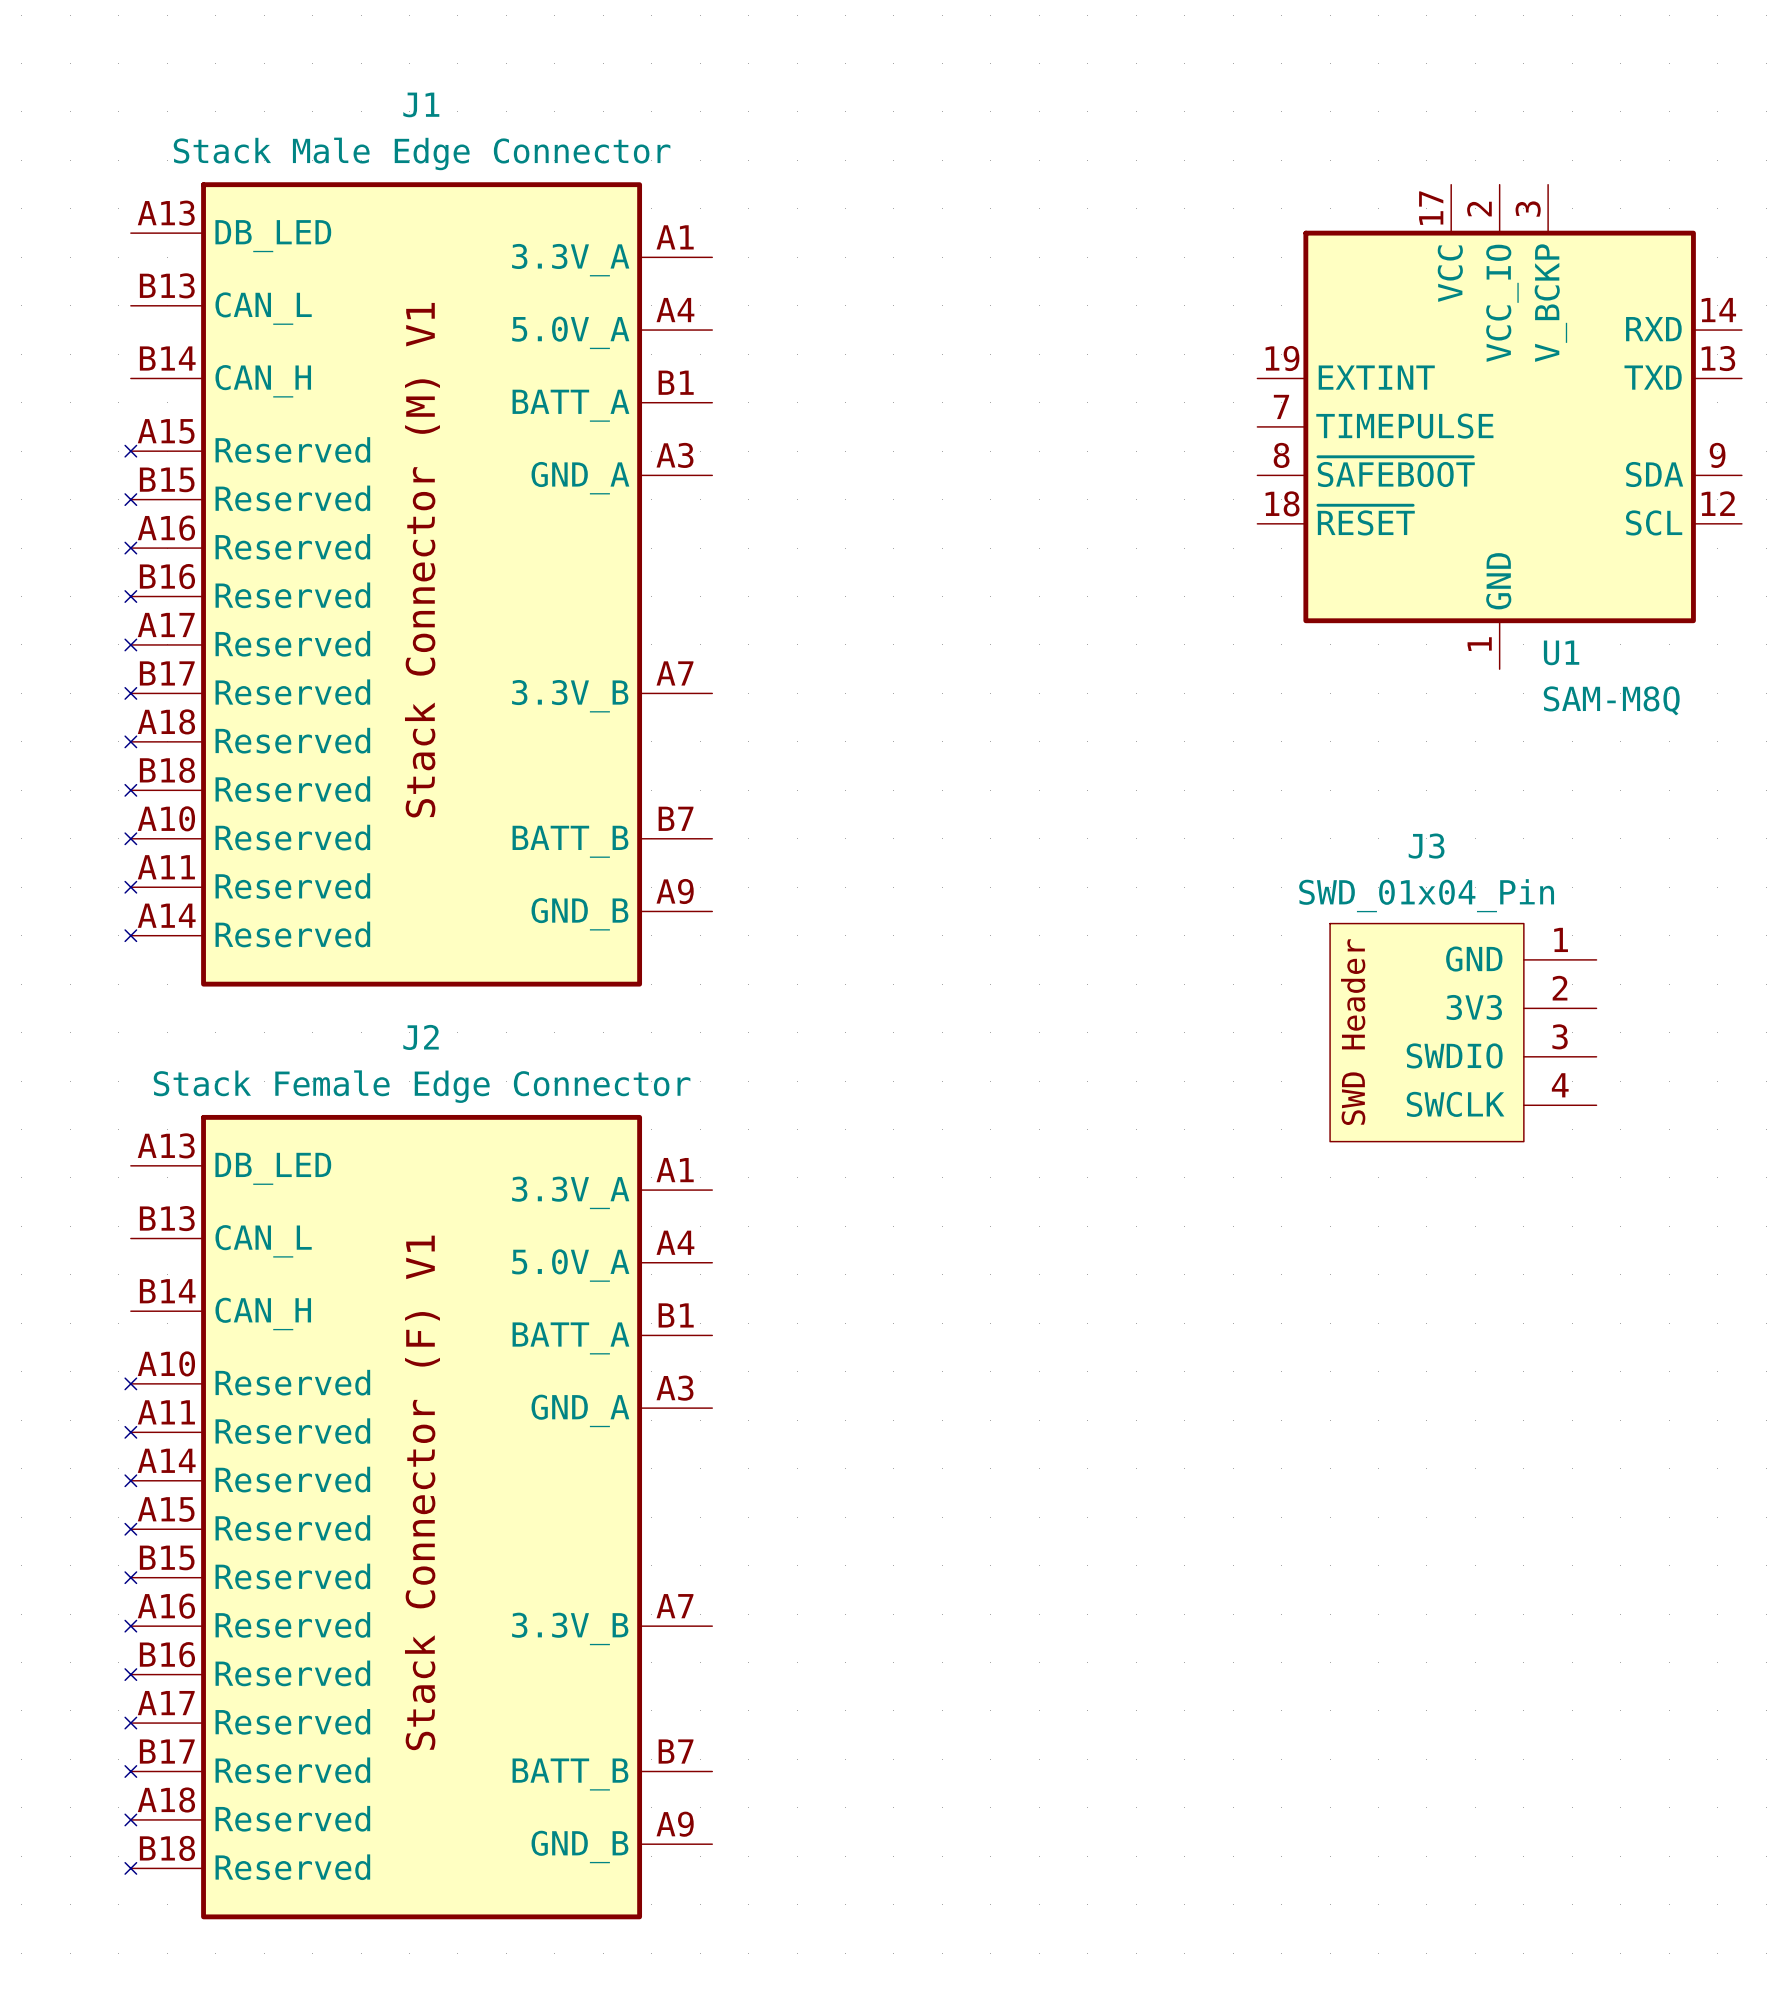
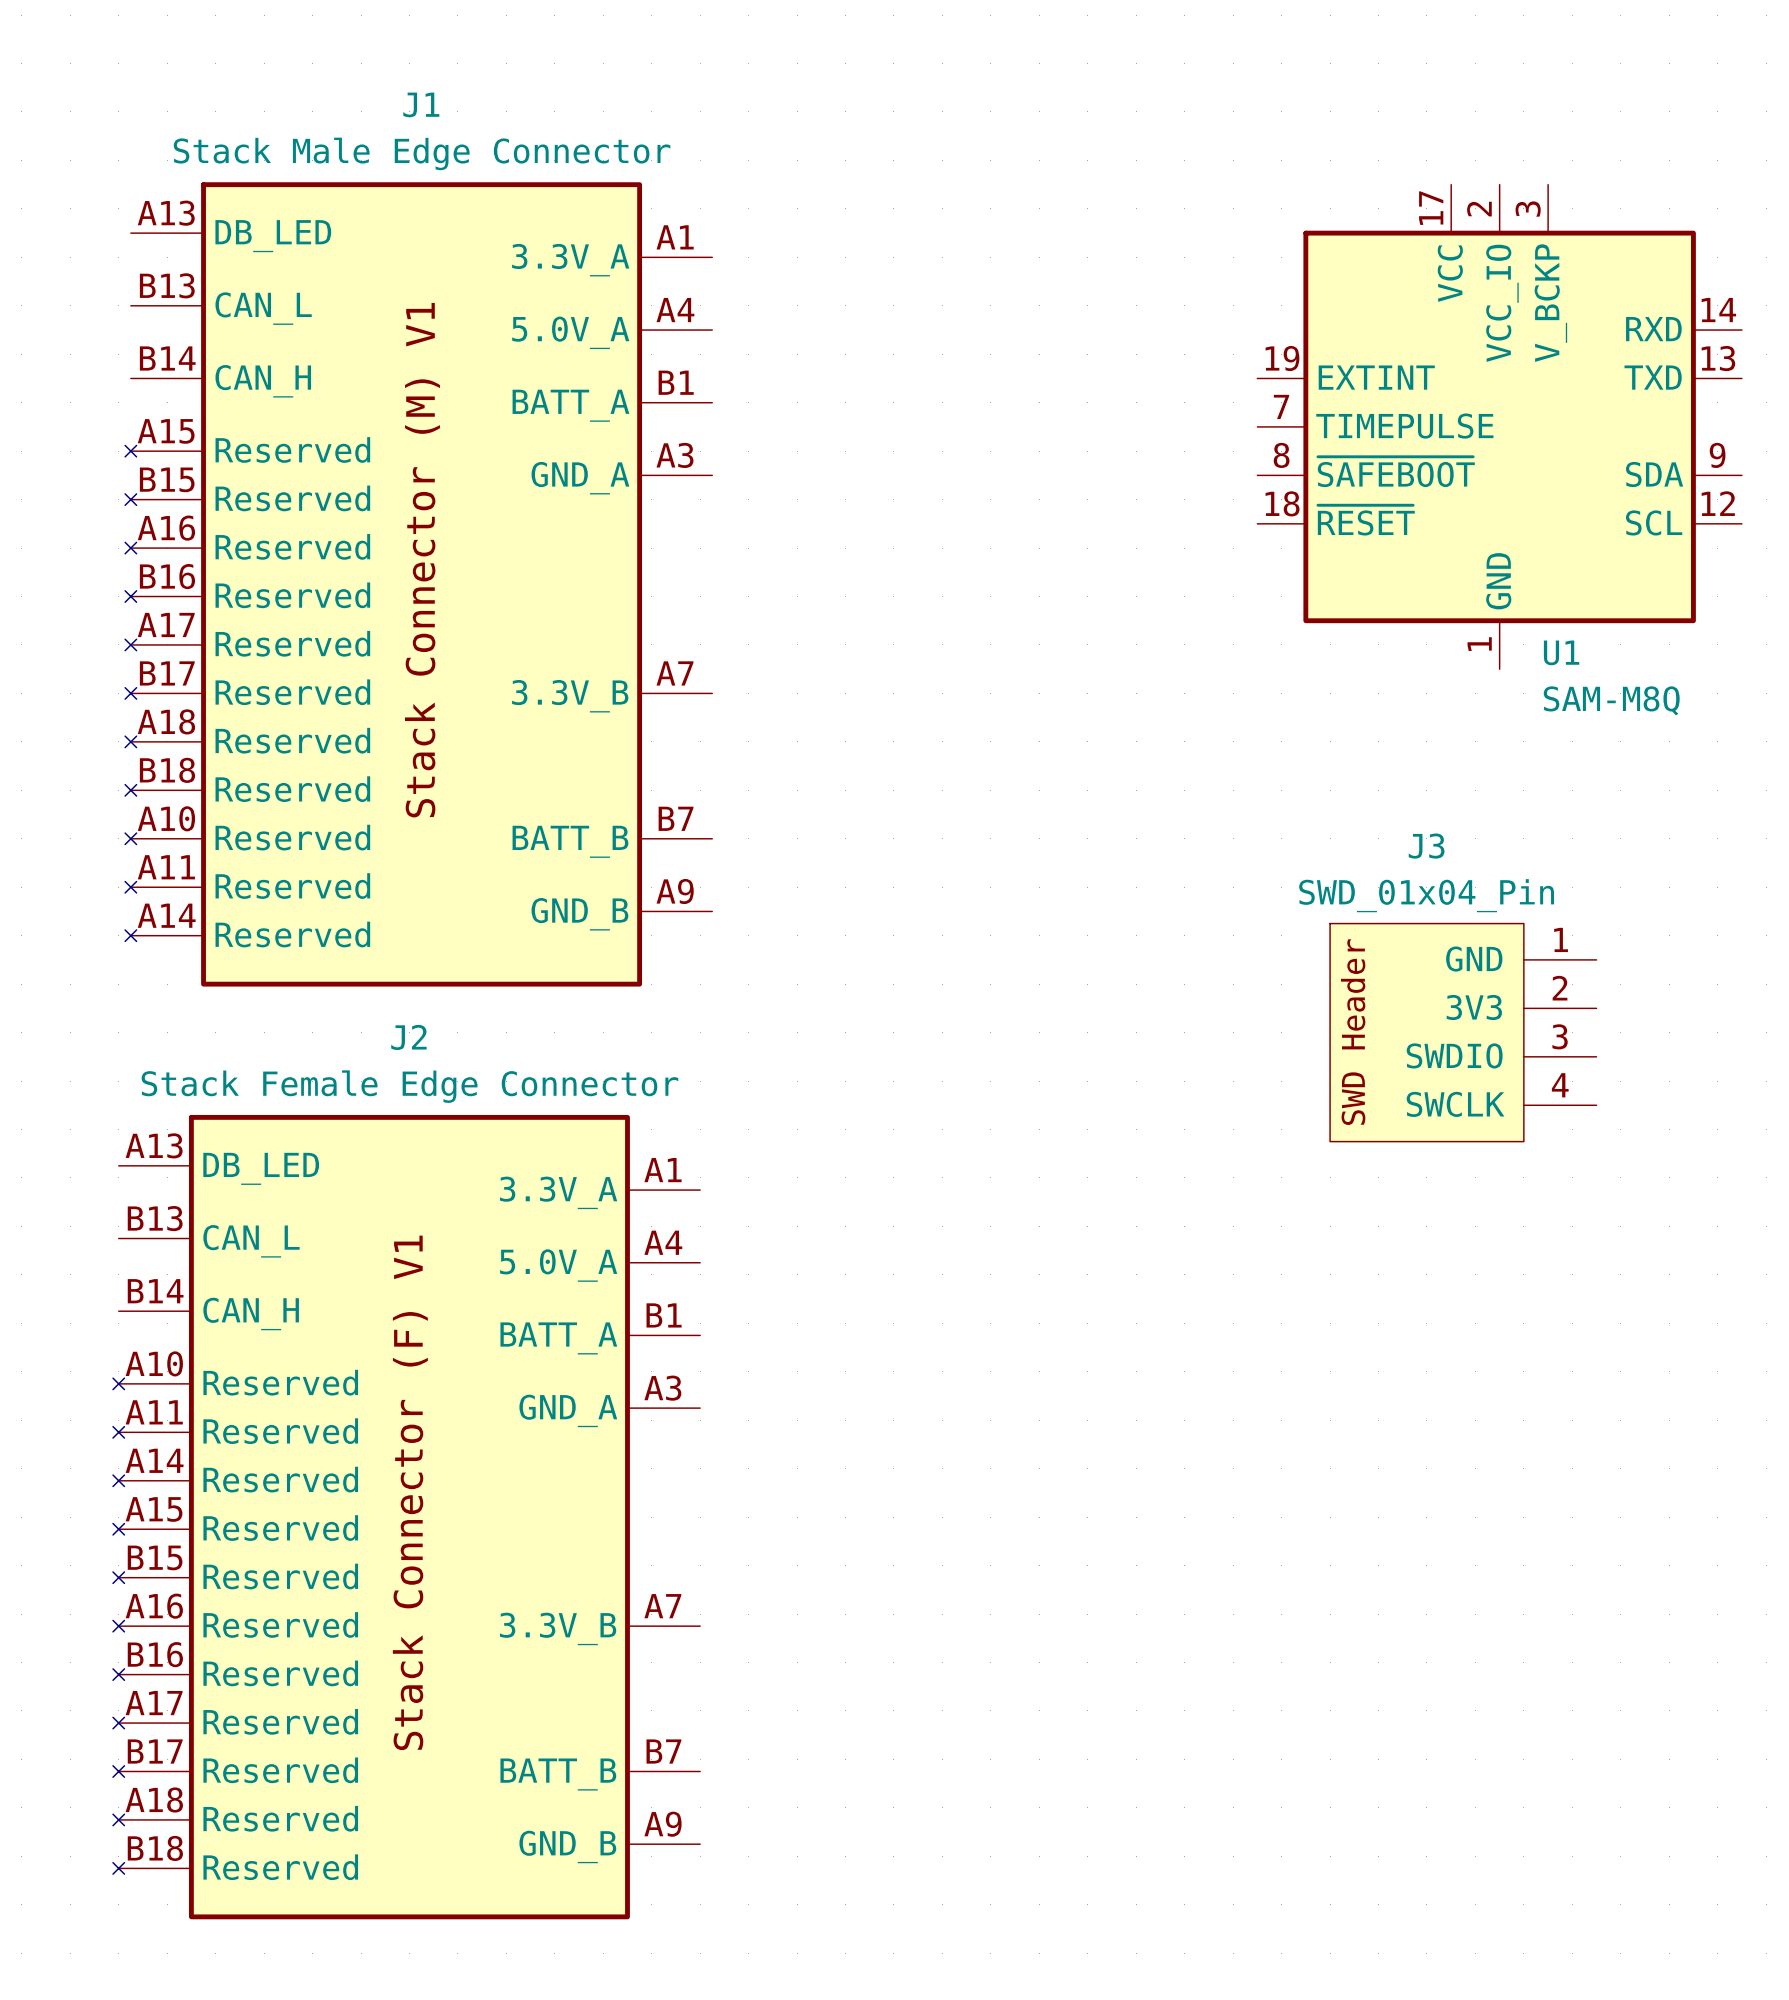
J2 position: (418, 1517) -> (406, 1517)

